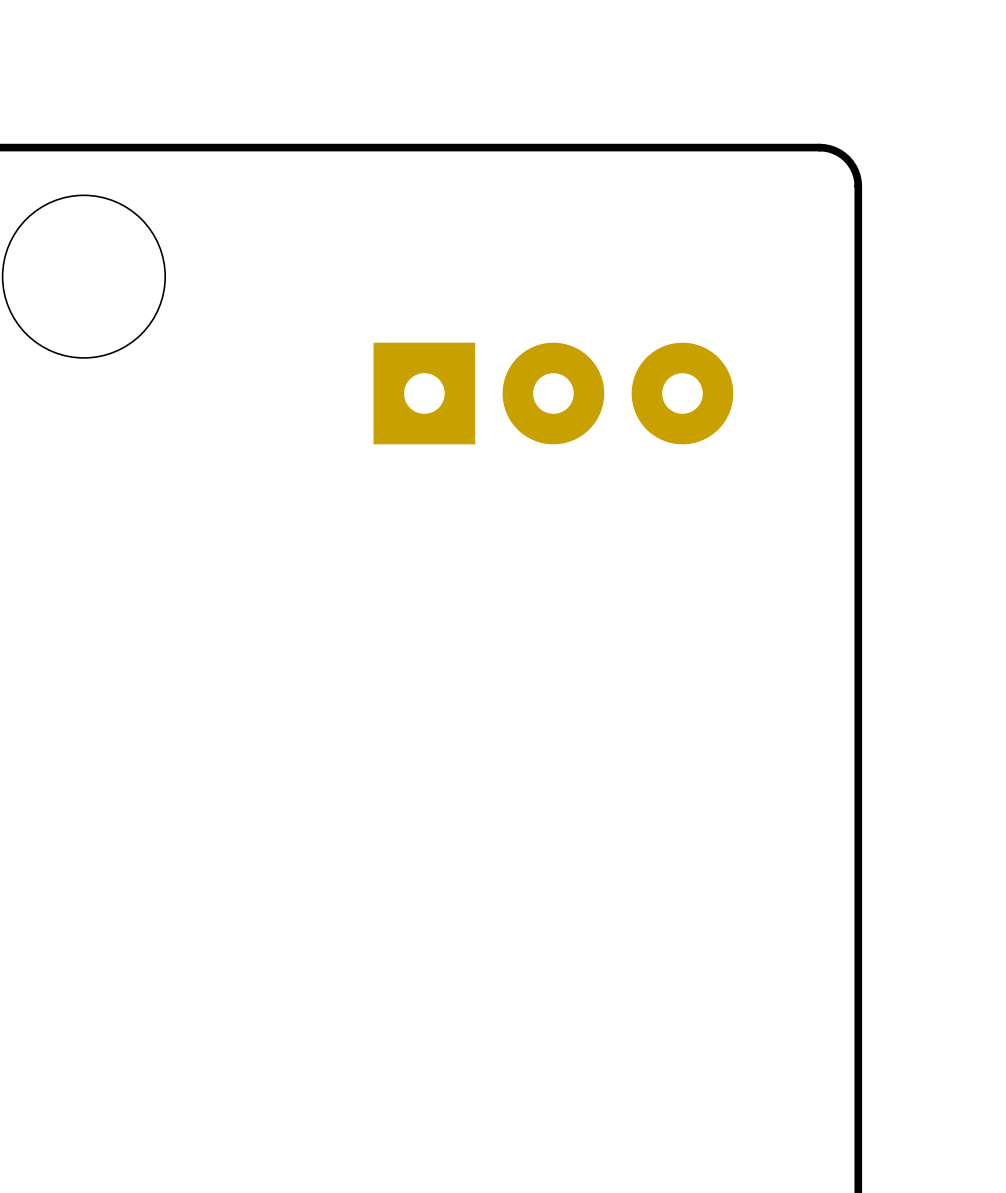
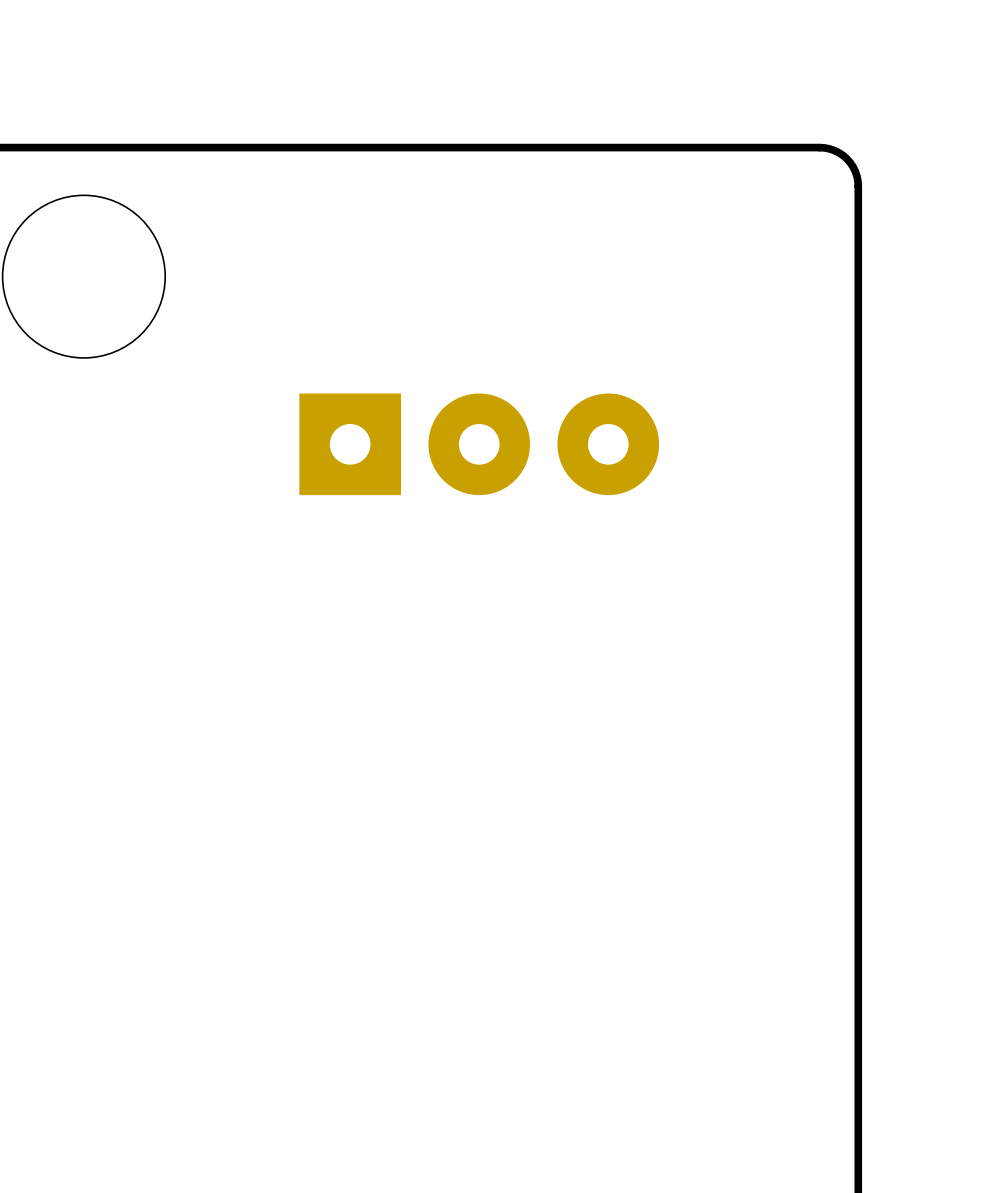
part position: (553, 393) -> (479, 444)

